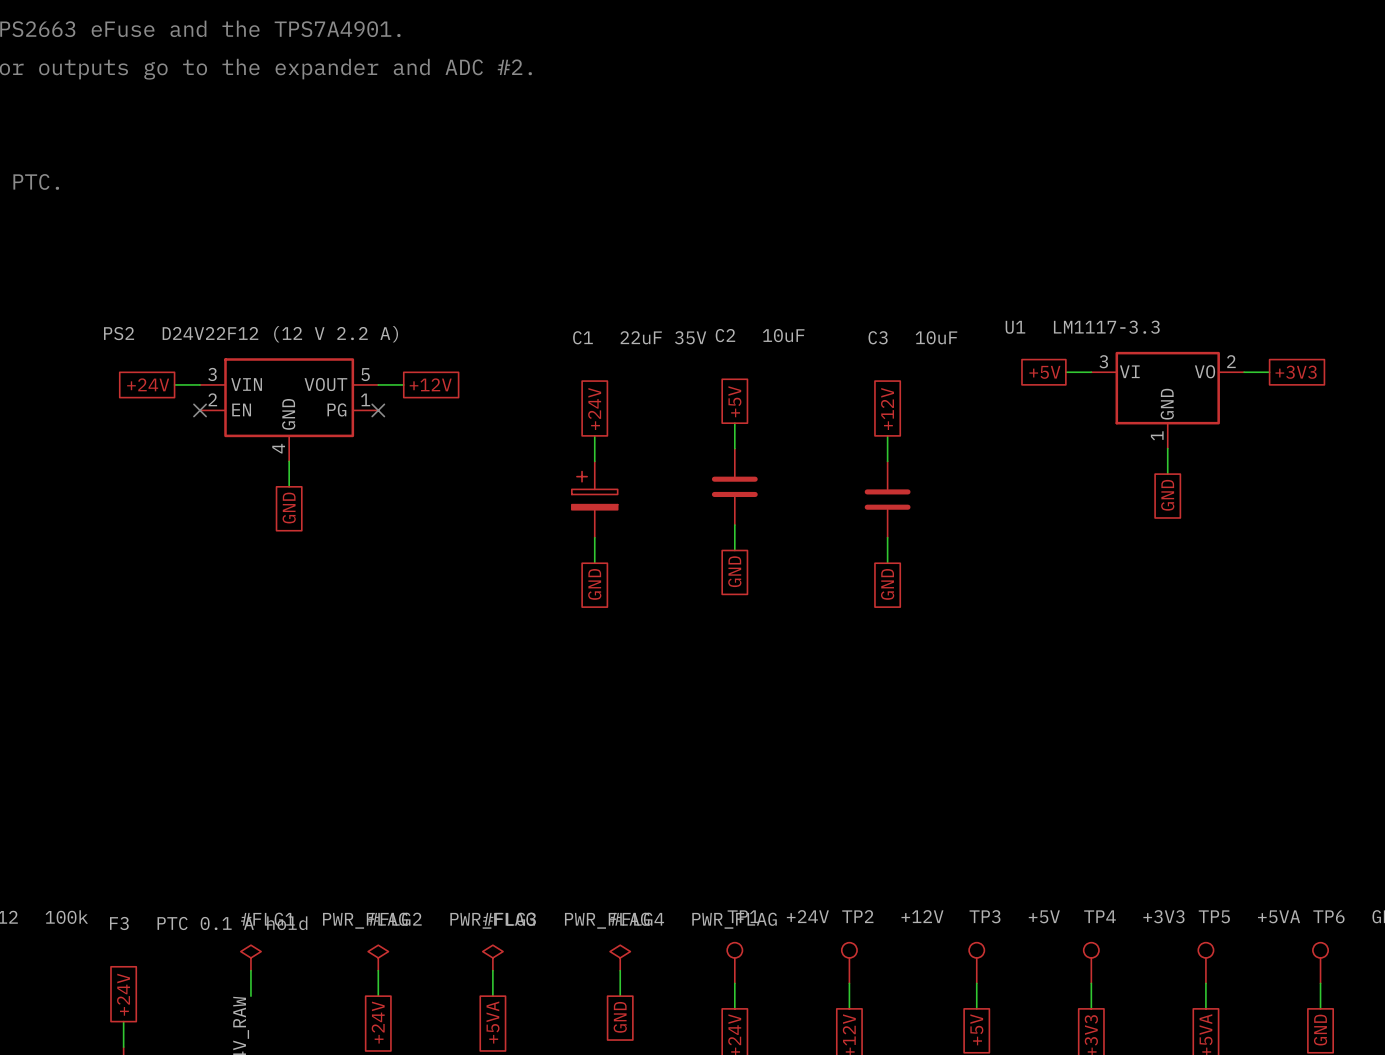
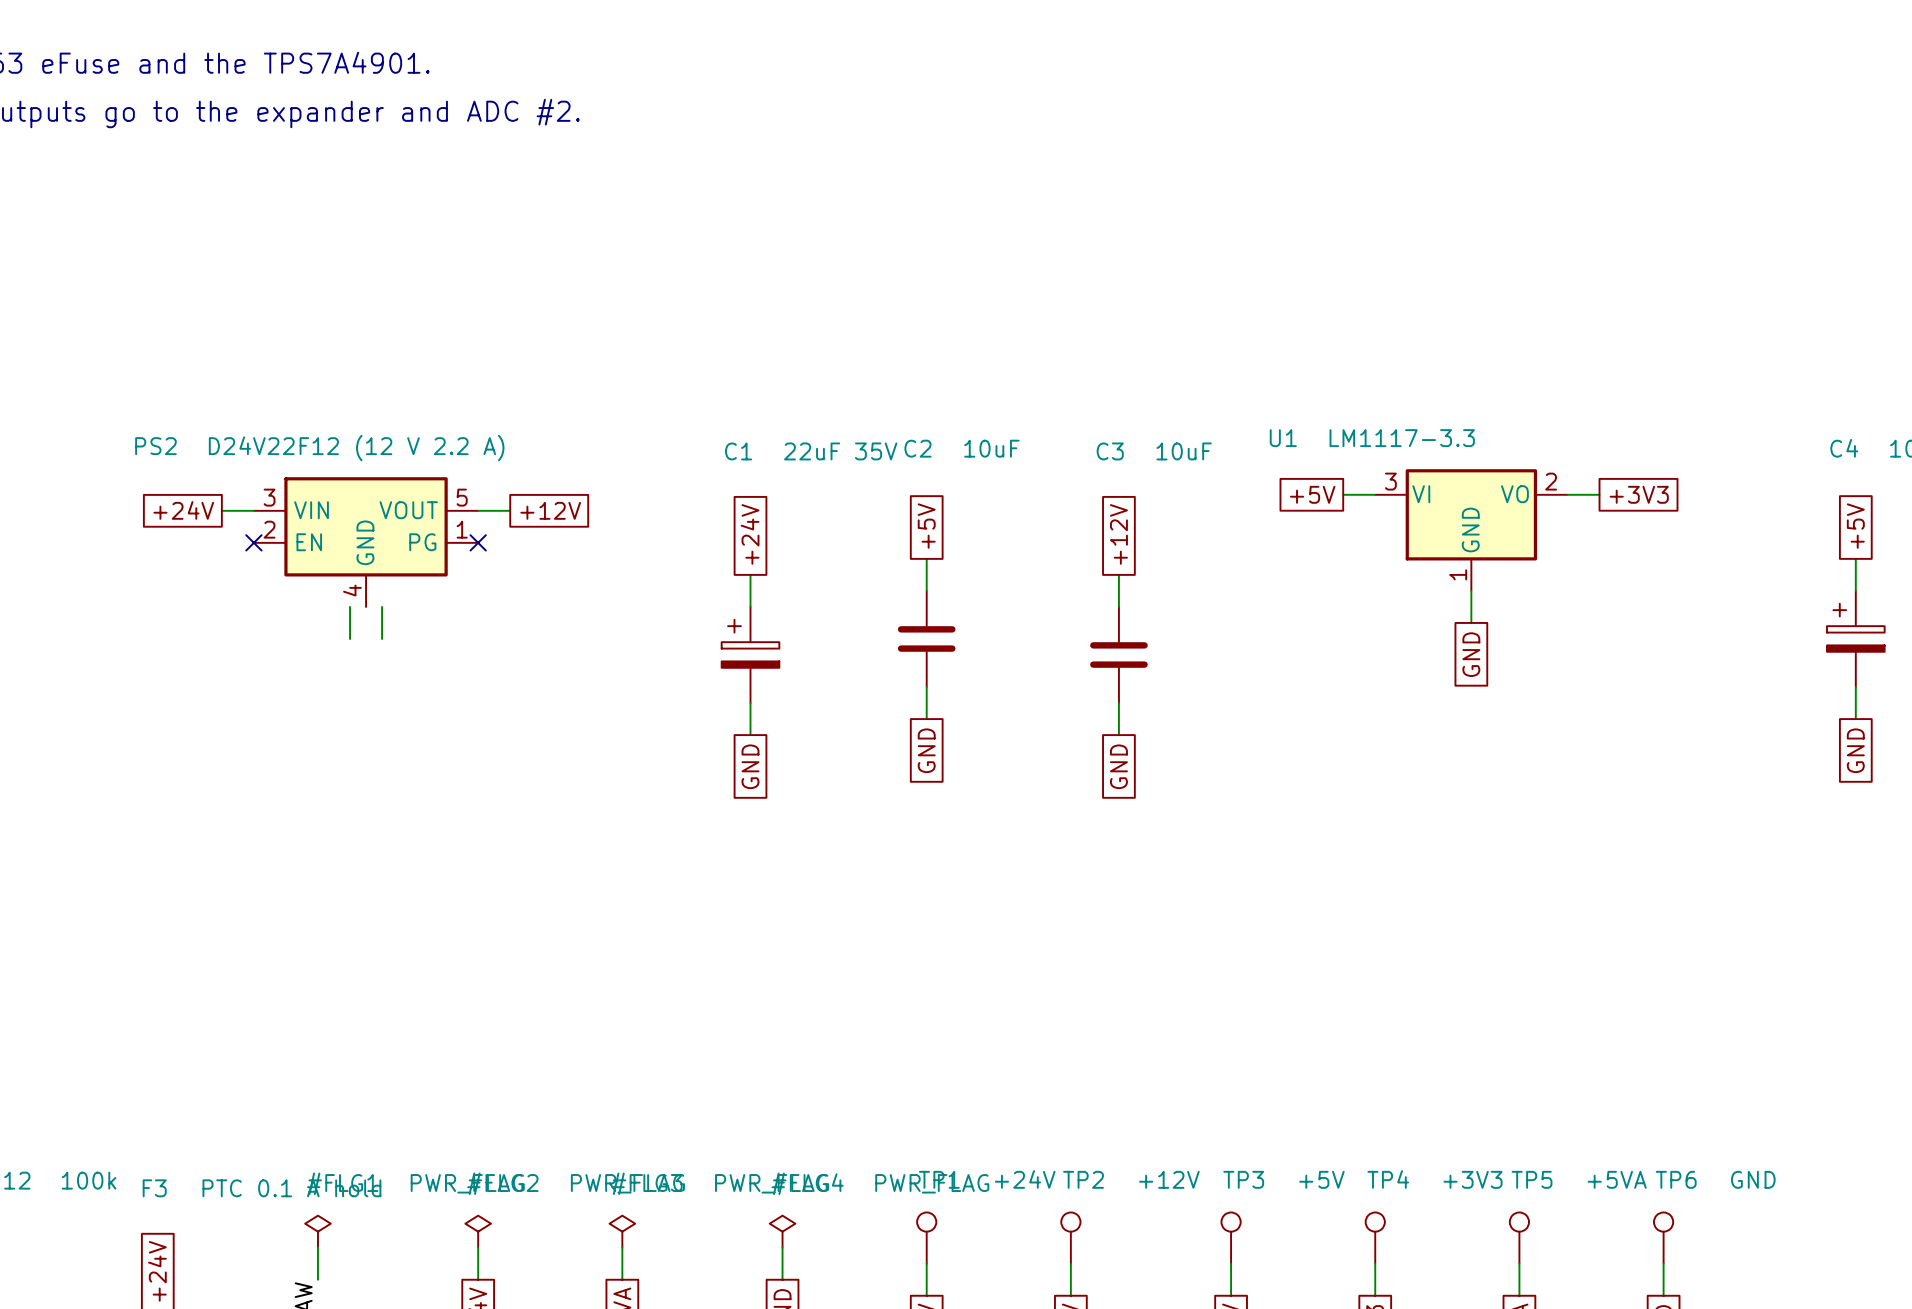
wire: (289, 461) (289, 486) -> (350, 606) (350, 638)
wire: none -> (382, 606) (382, 638)
global label: GND (289, 508) -> none

